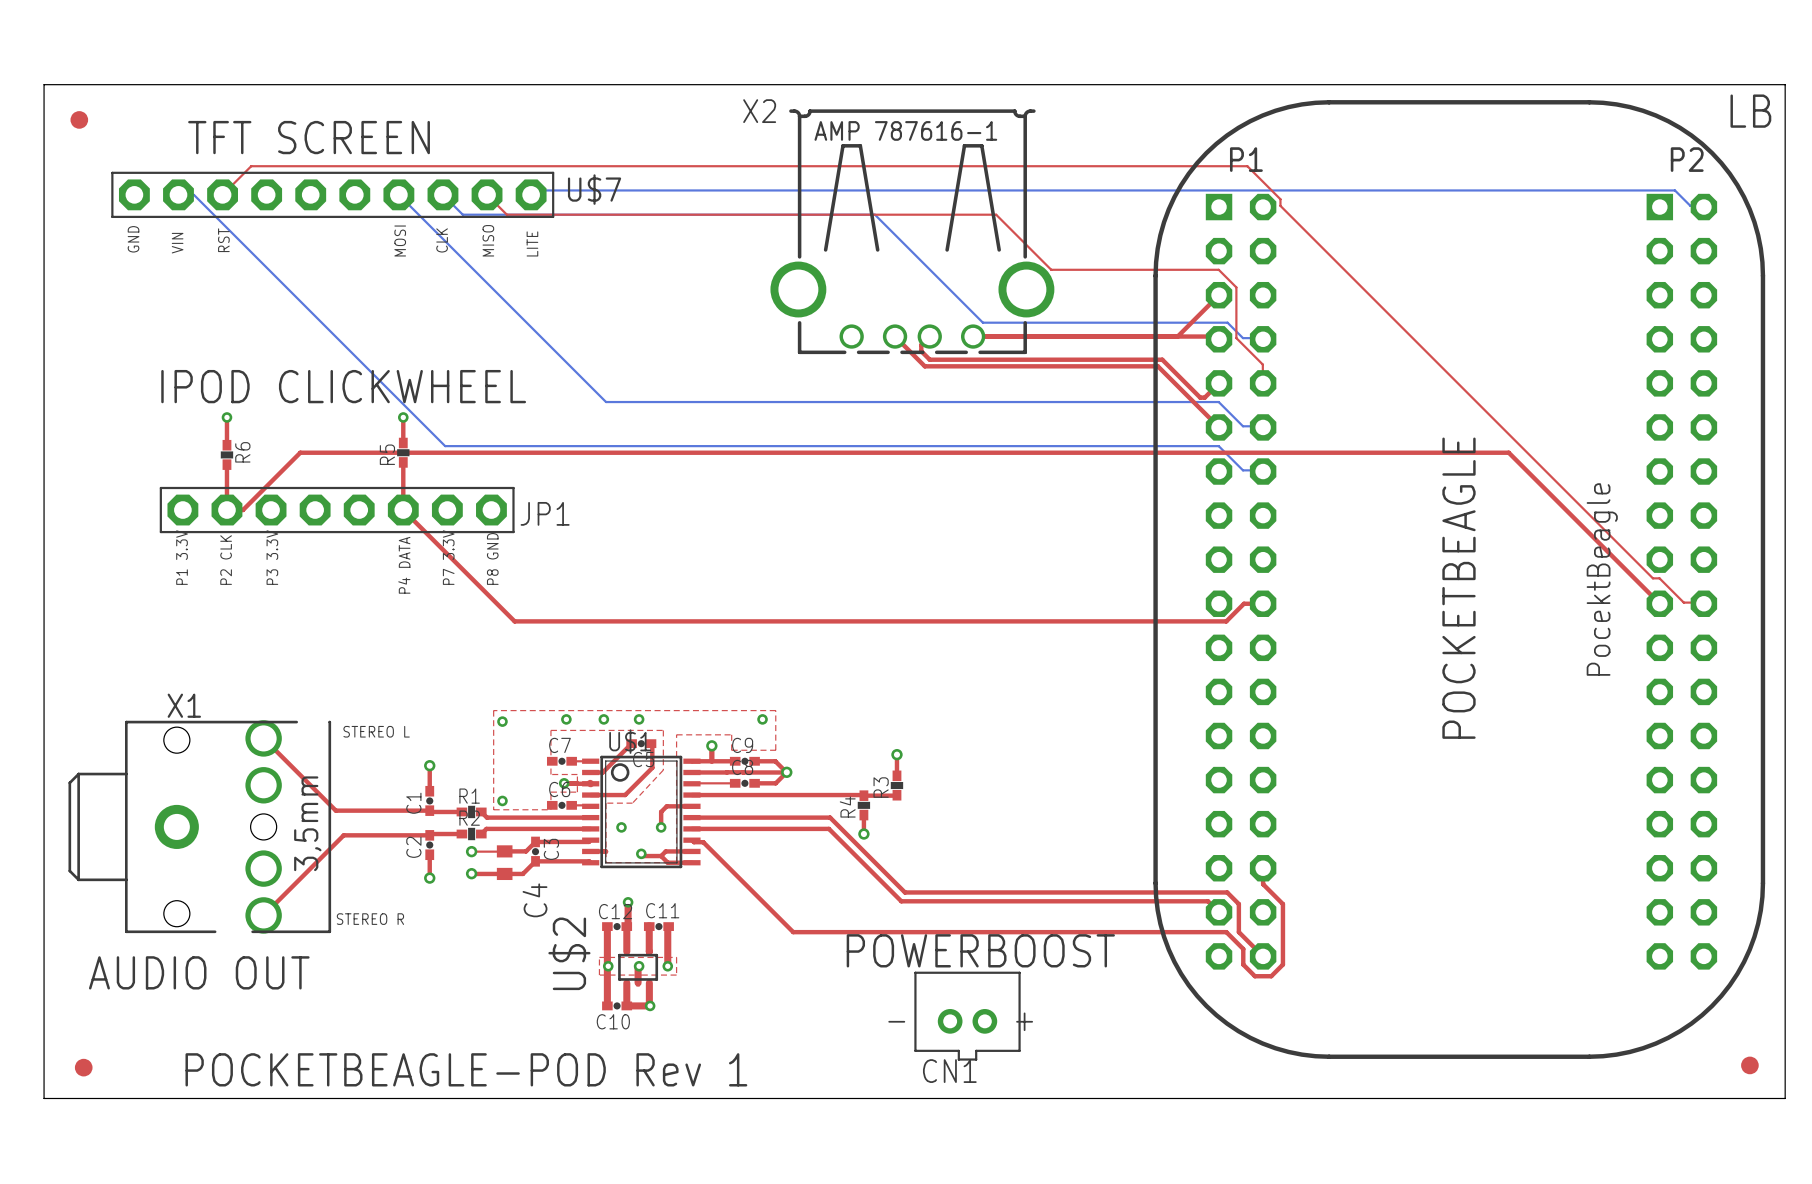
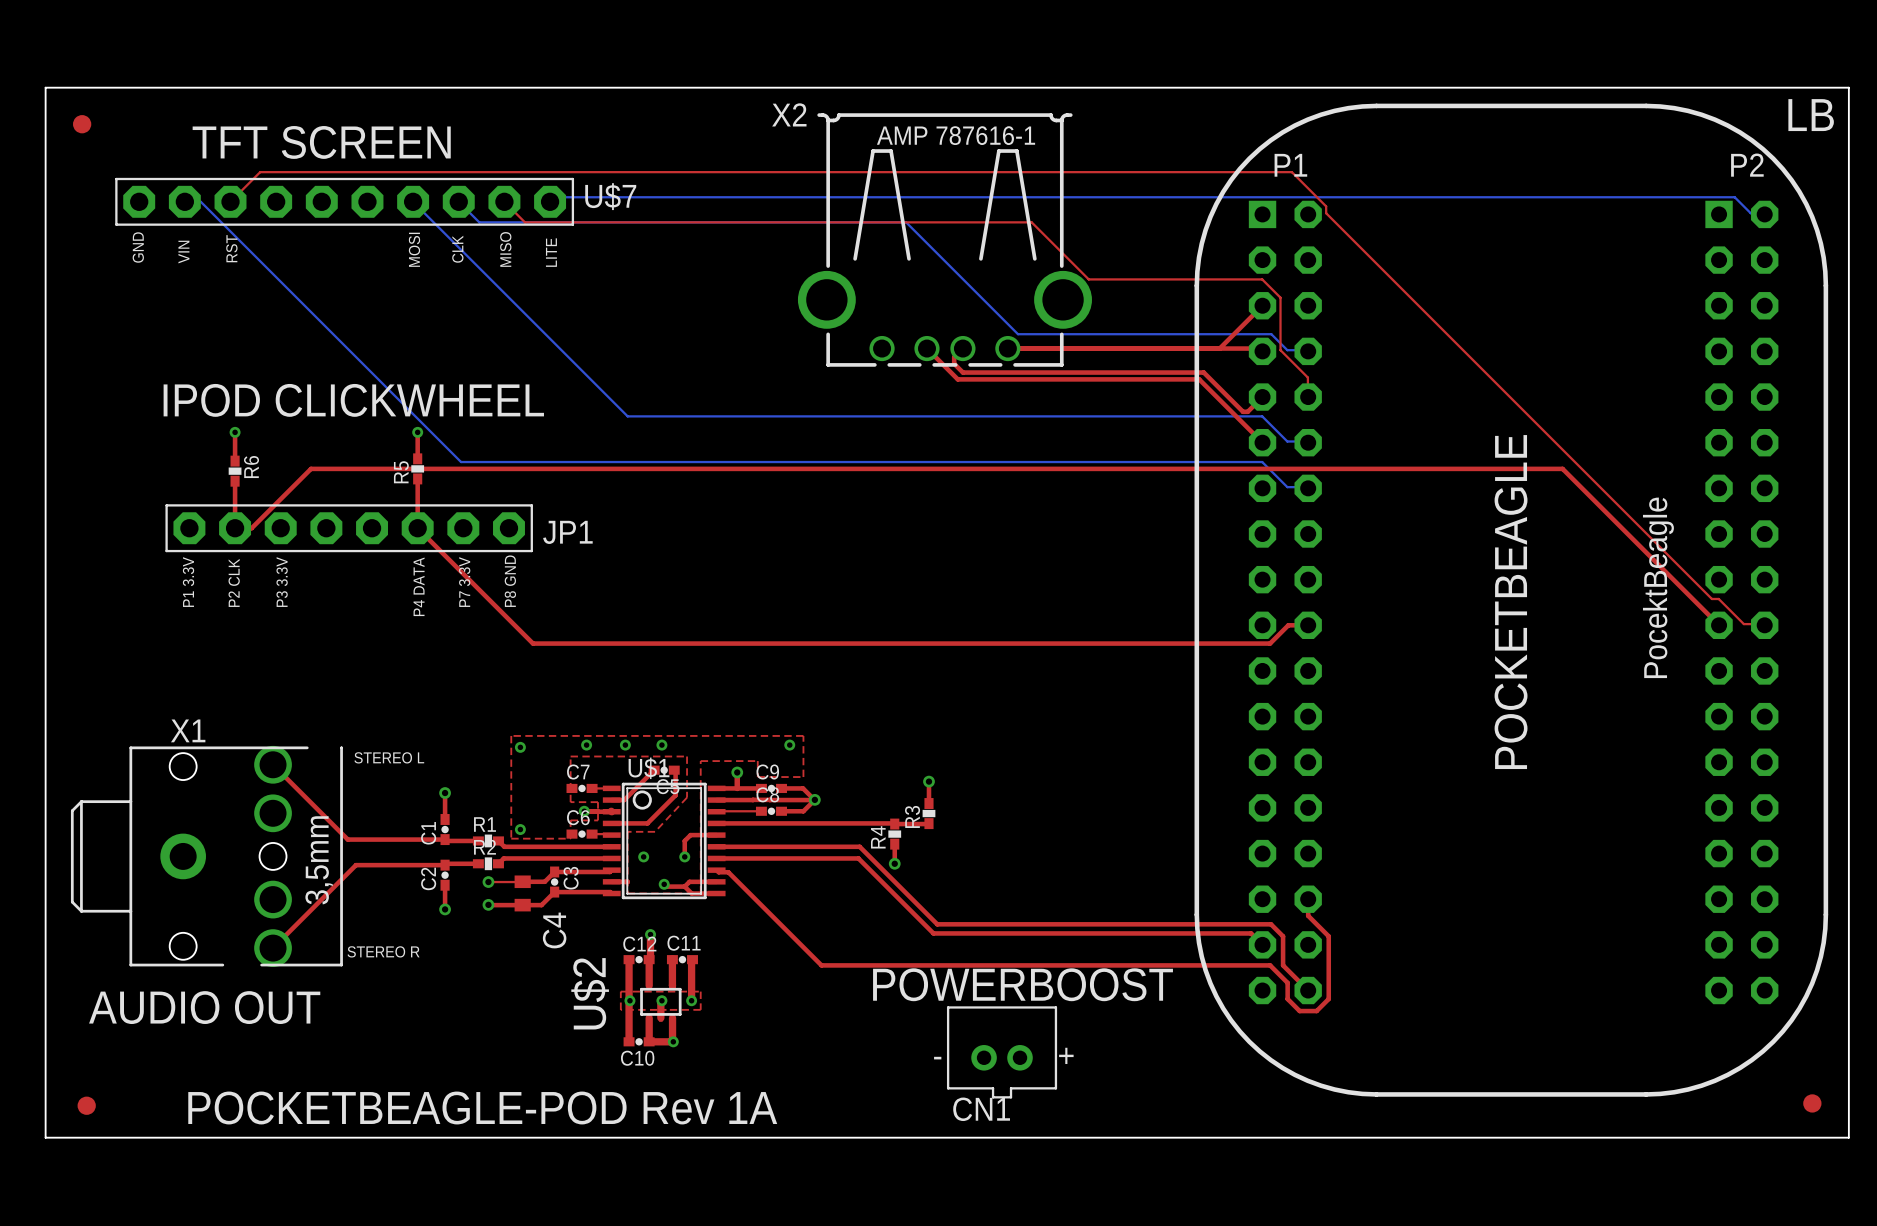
text: POCKETBEAGLE-POD Rev 1 (466, 1069) -> POCKETBEAGLE-POD Rev 1A (482, 1108)

